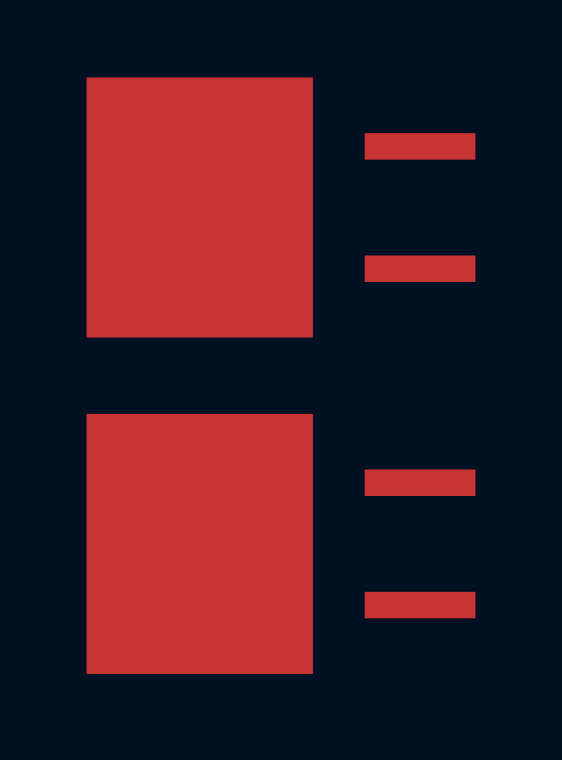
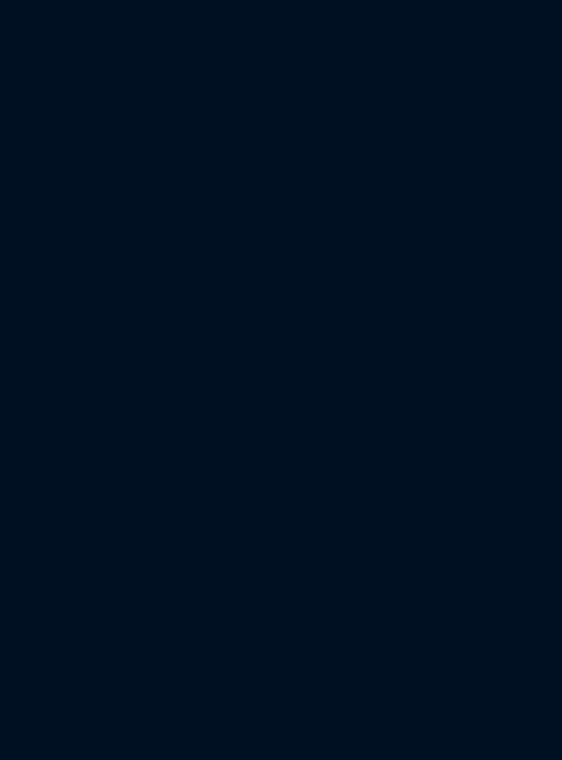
part: (280, 207) -> none
part: (280, 543) -> none

